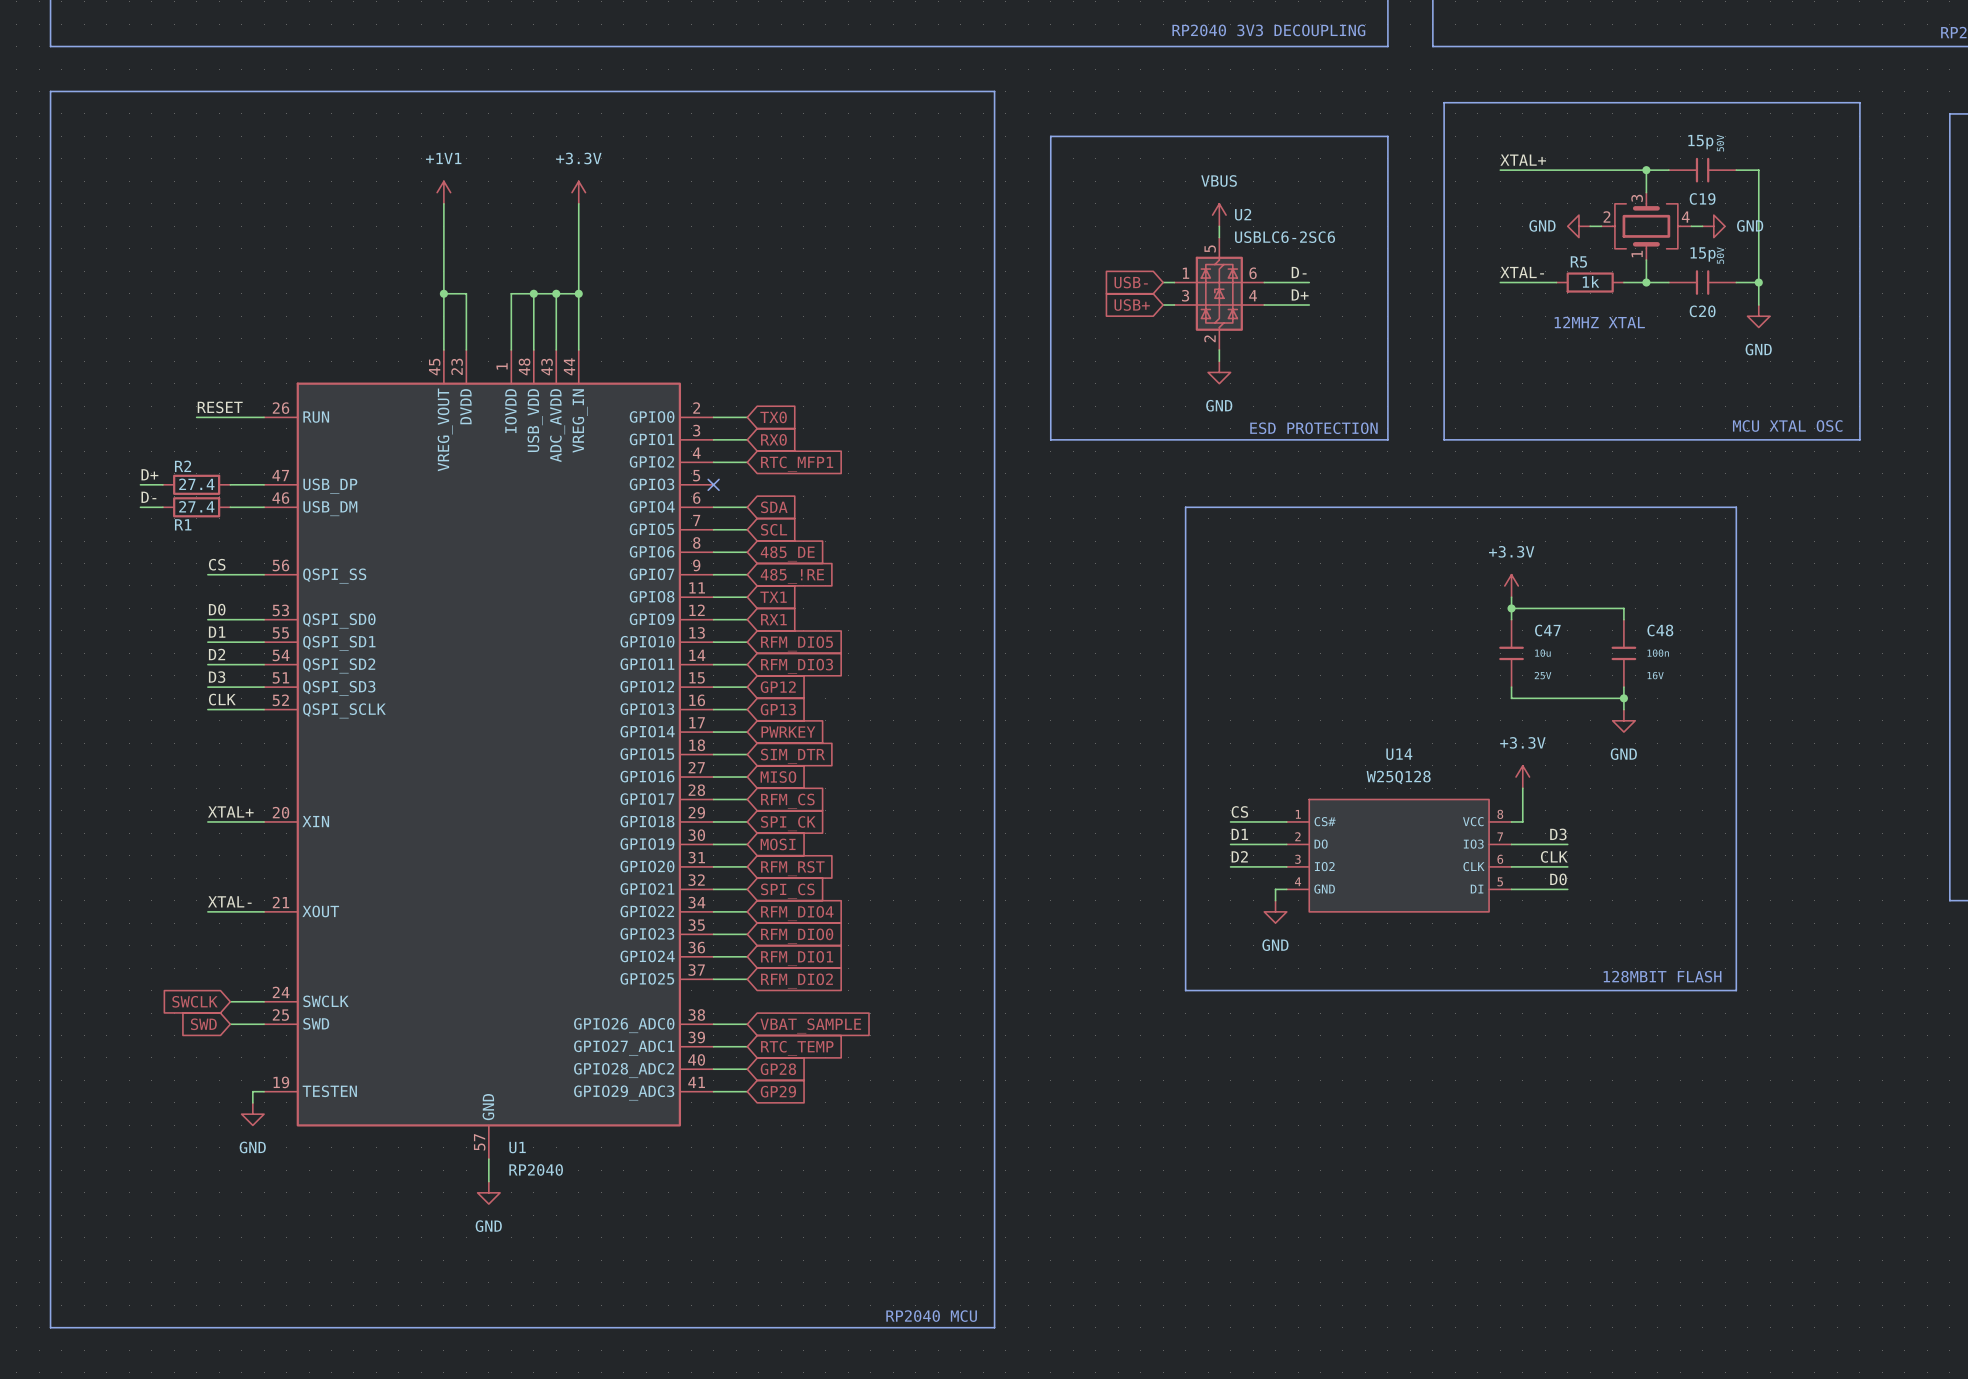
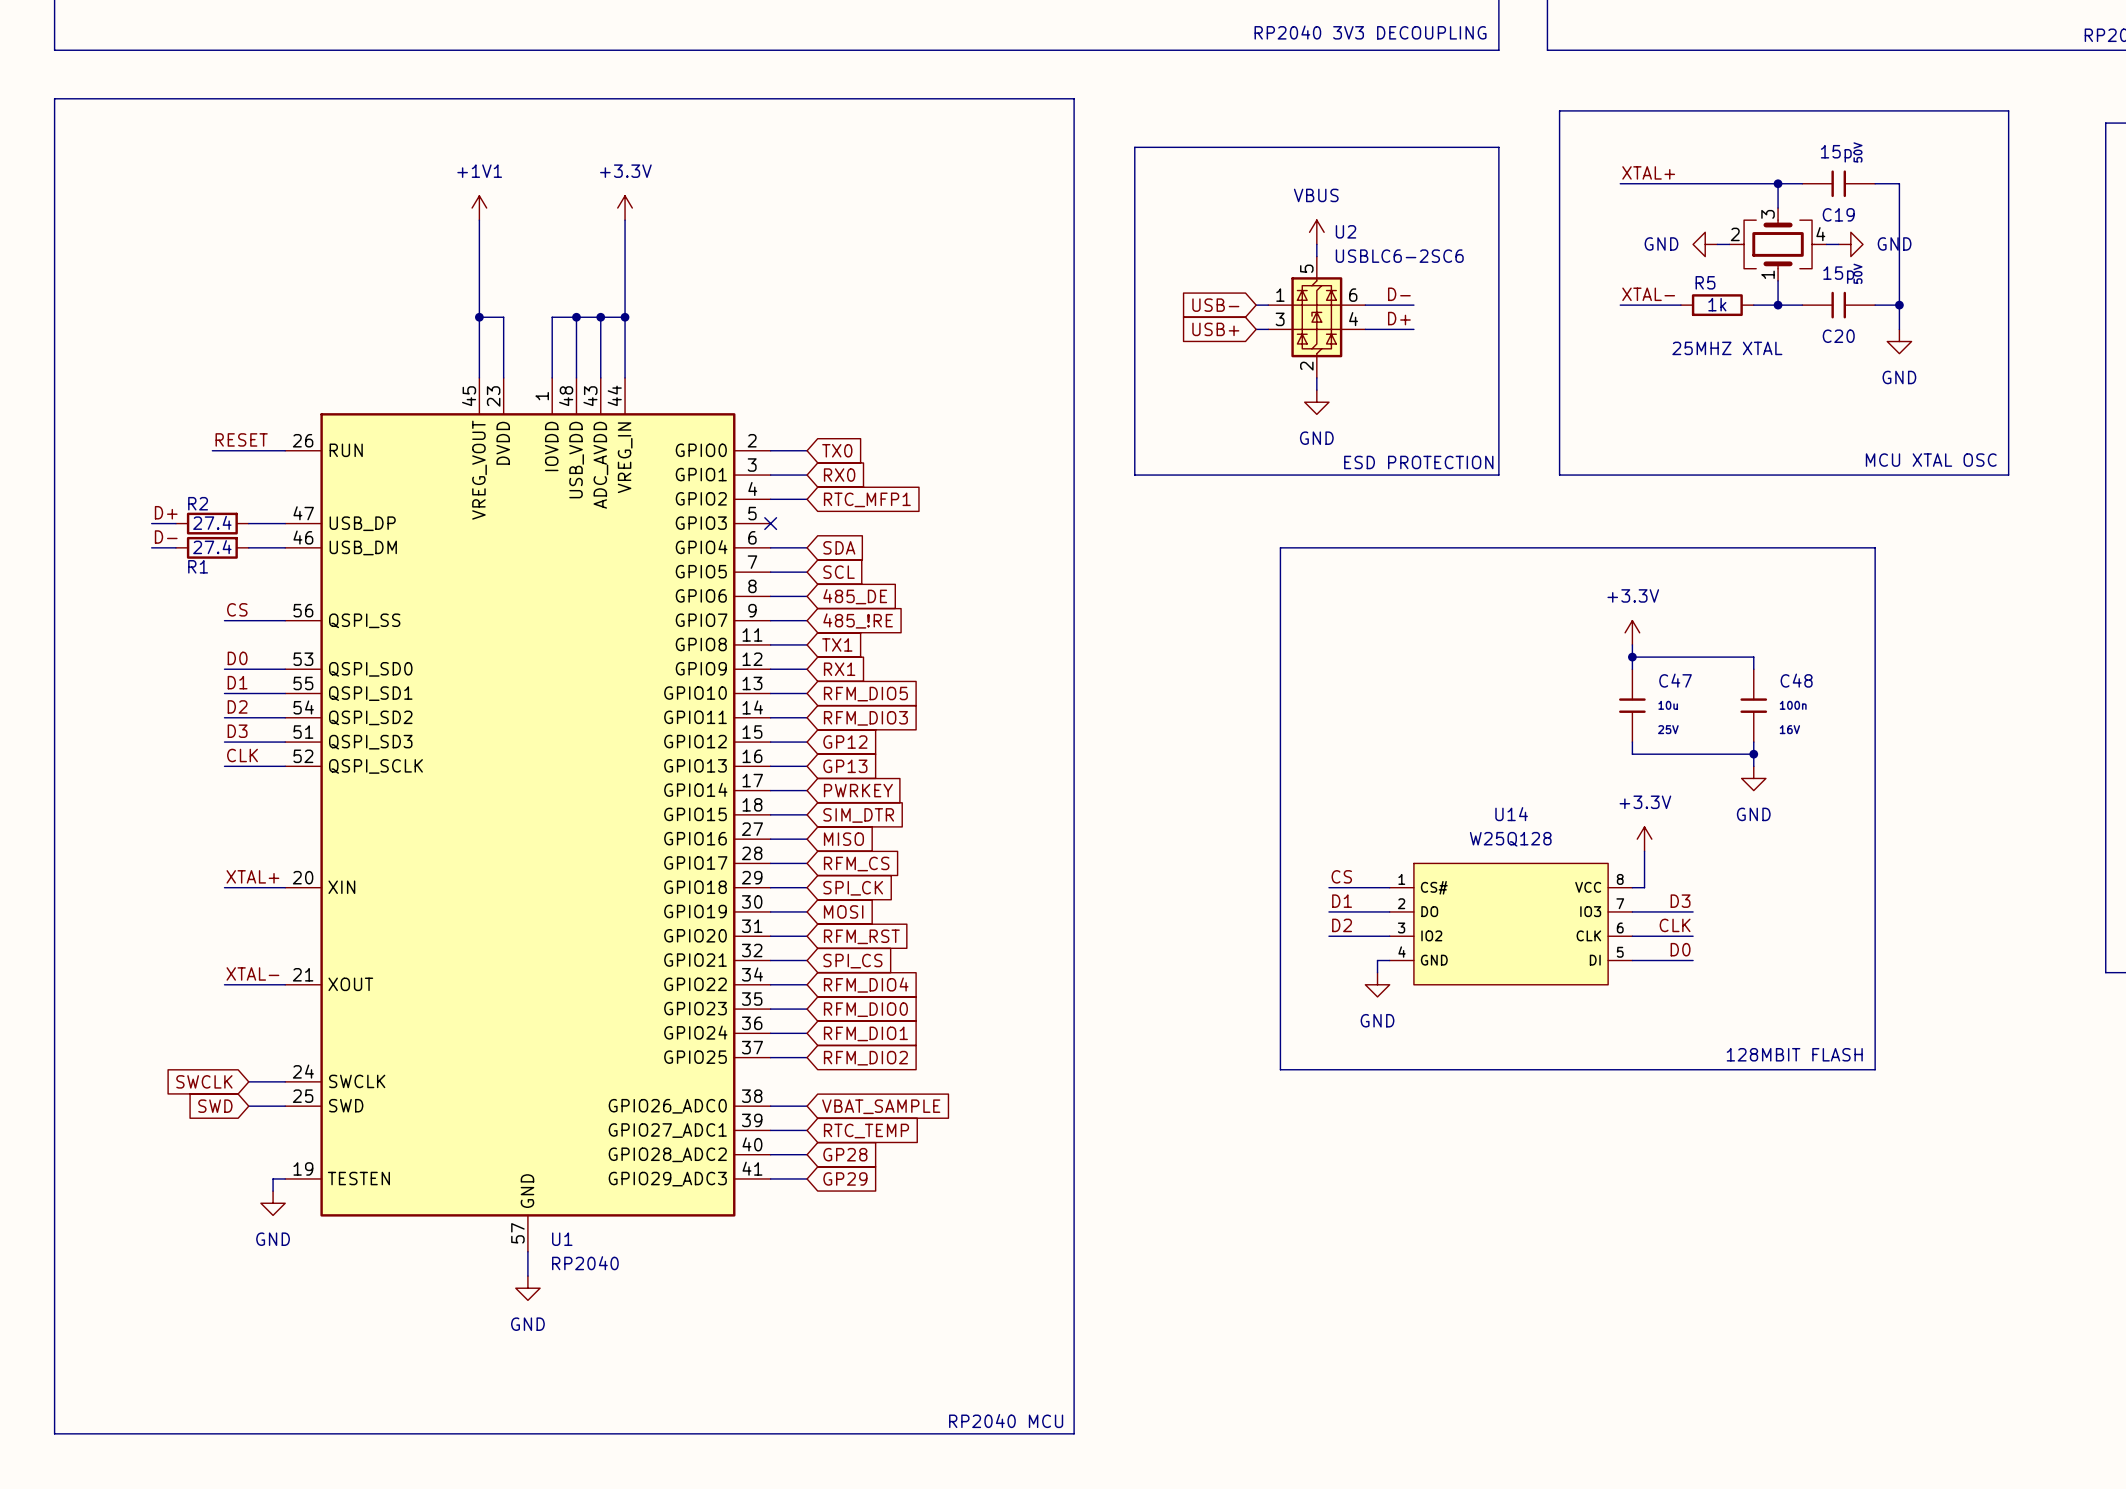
text: 12MHZ XTAL (1599, 322) -> 25MHZ XTAL (1727, 348)

